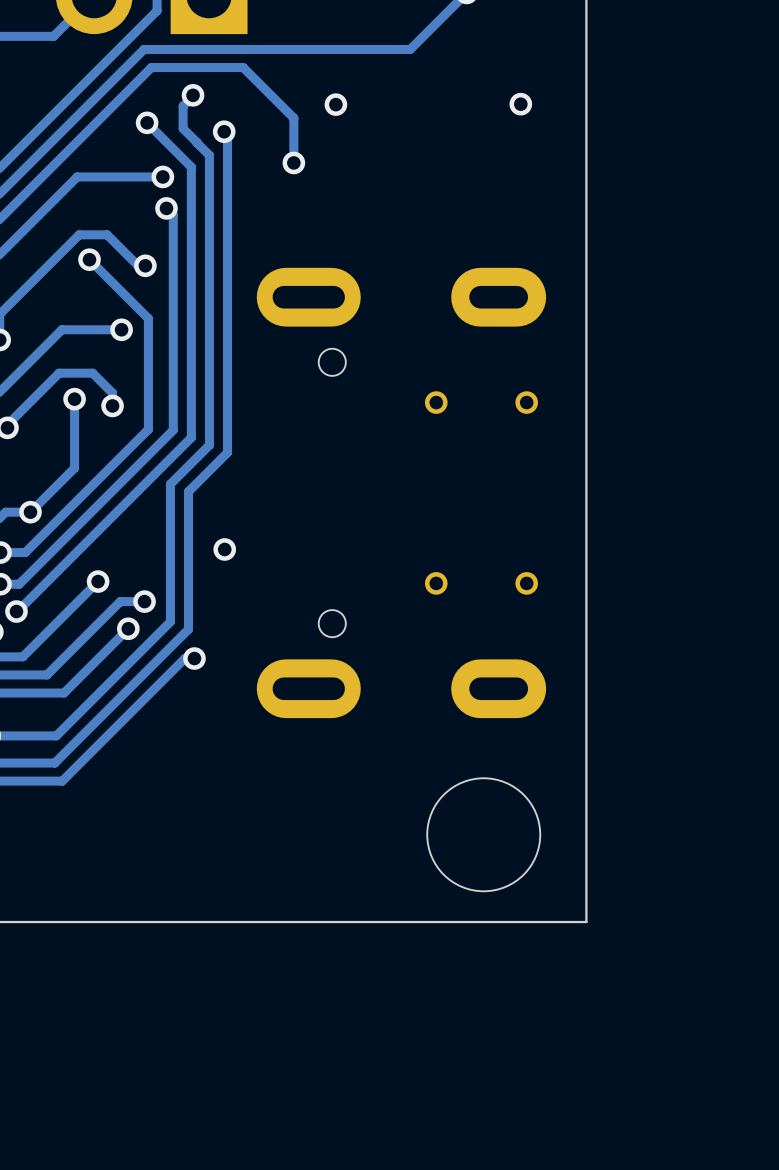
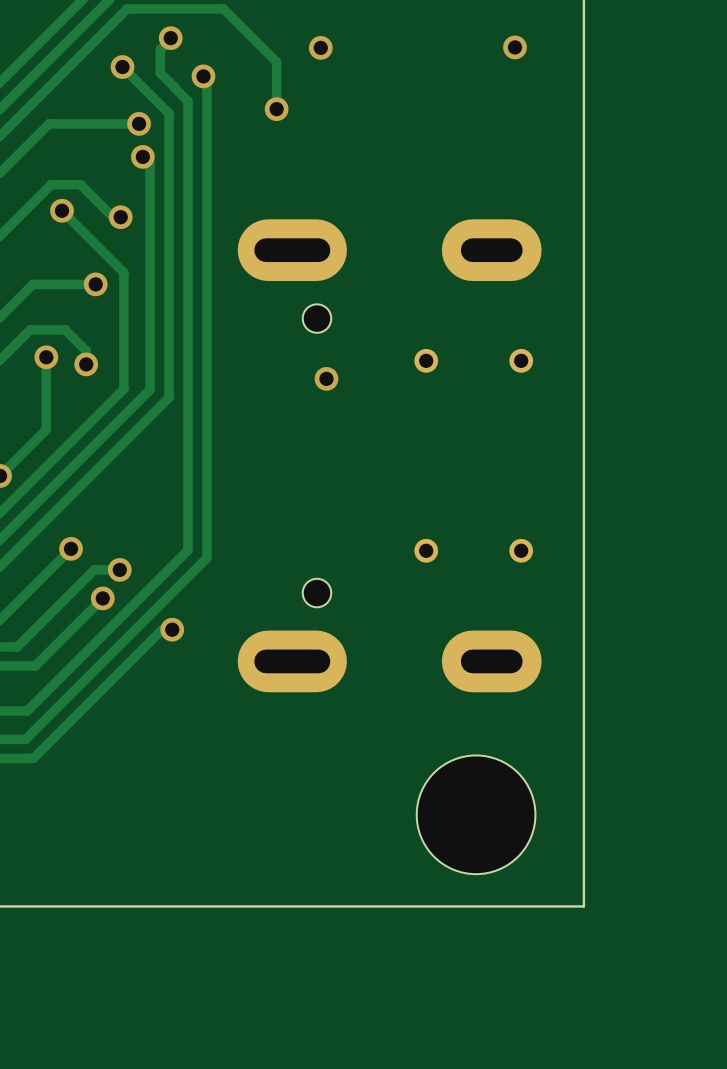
track: (209, 445) (170, 484) (170, 621) -> (187, 405) (187, 550) (147, 591)
track: (227, 452) (188, 491) (188, 629) -> (206, 413) (206, 558) (165, 599)
via position: (224, 549) -> (326, 378)

